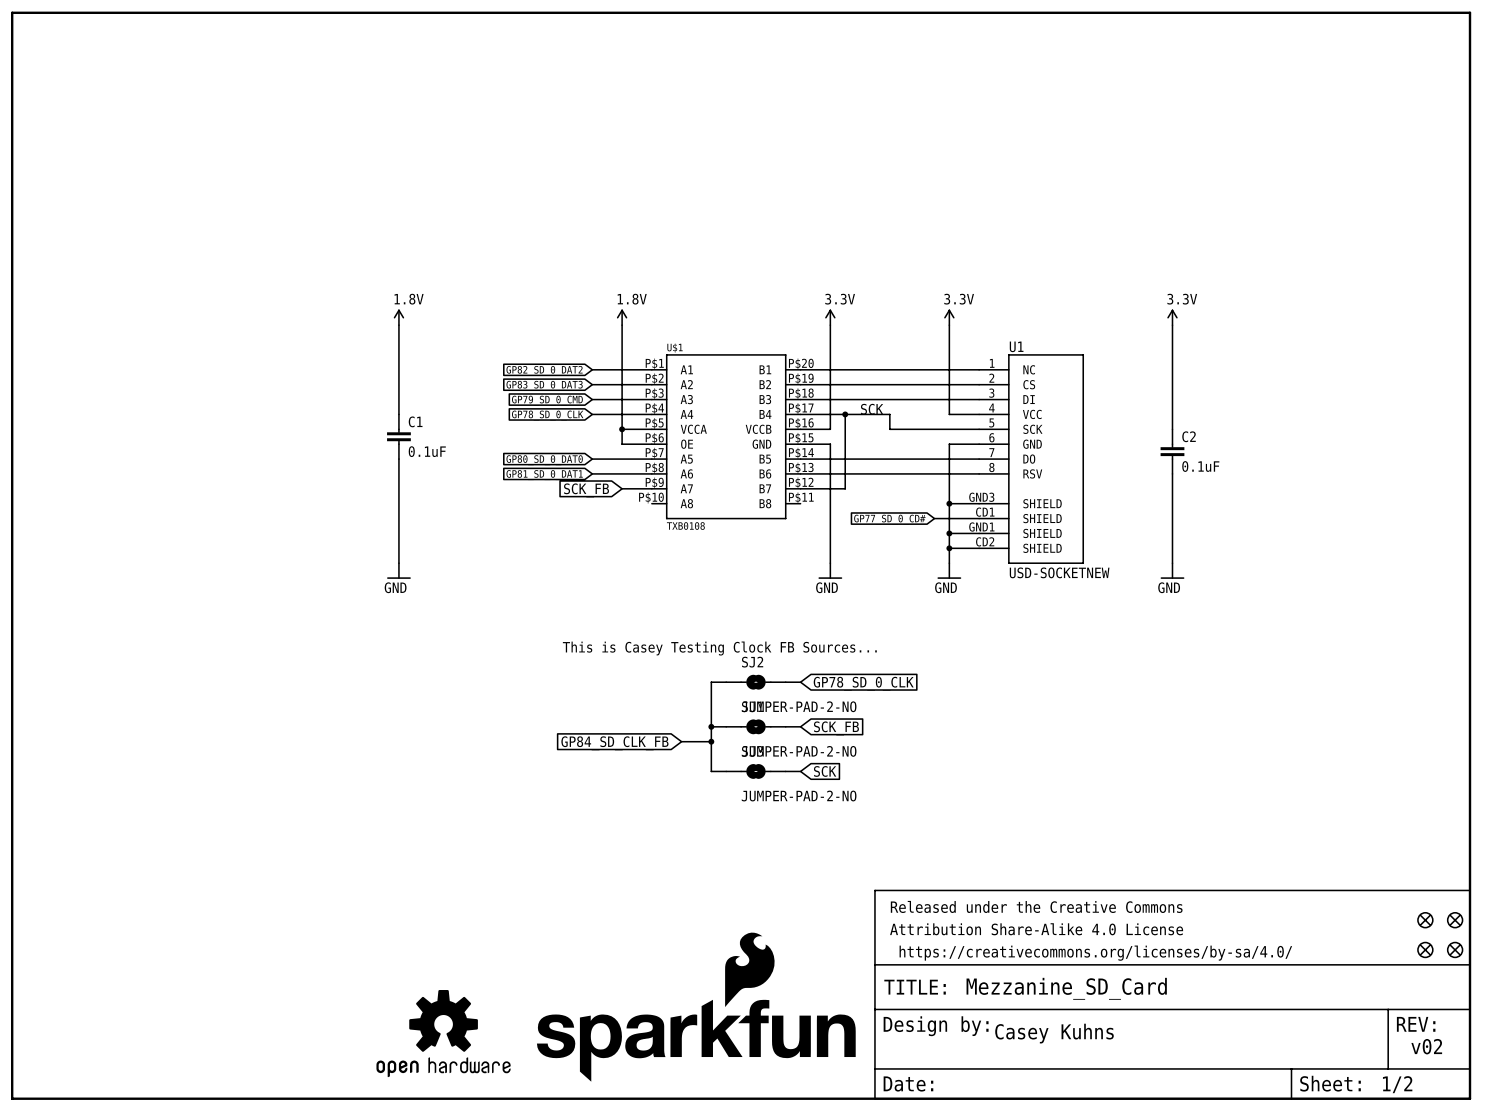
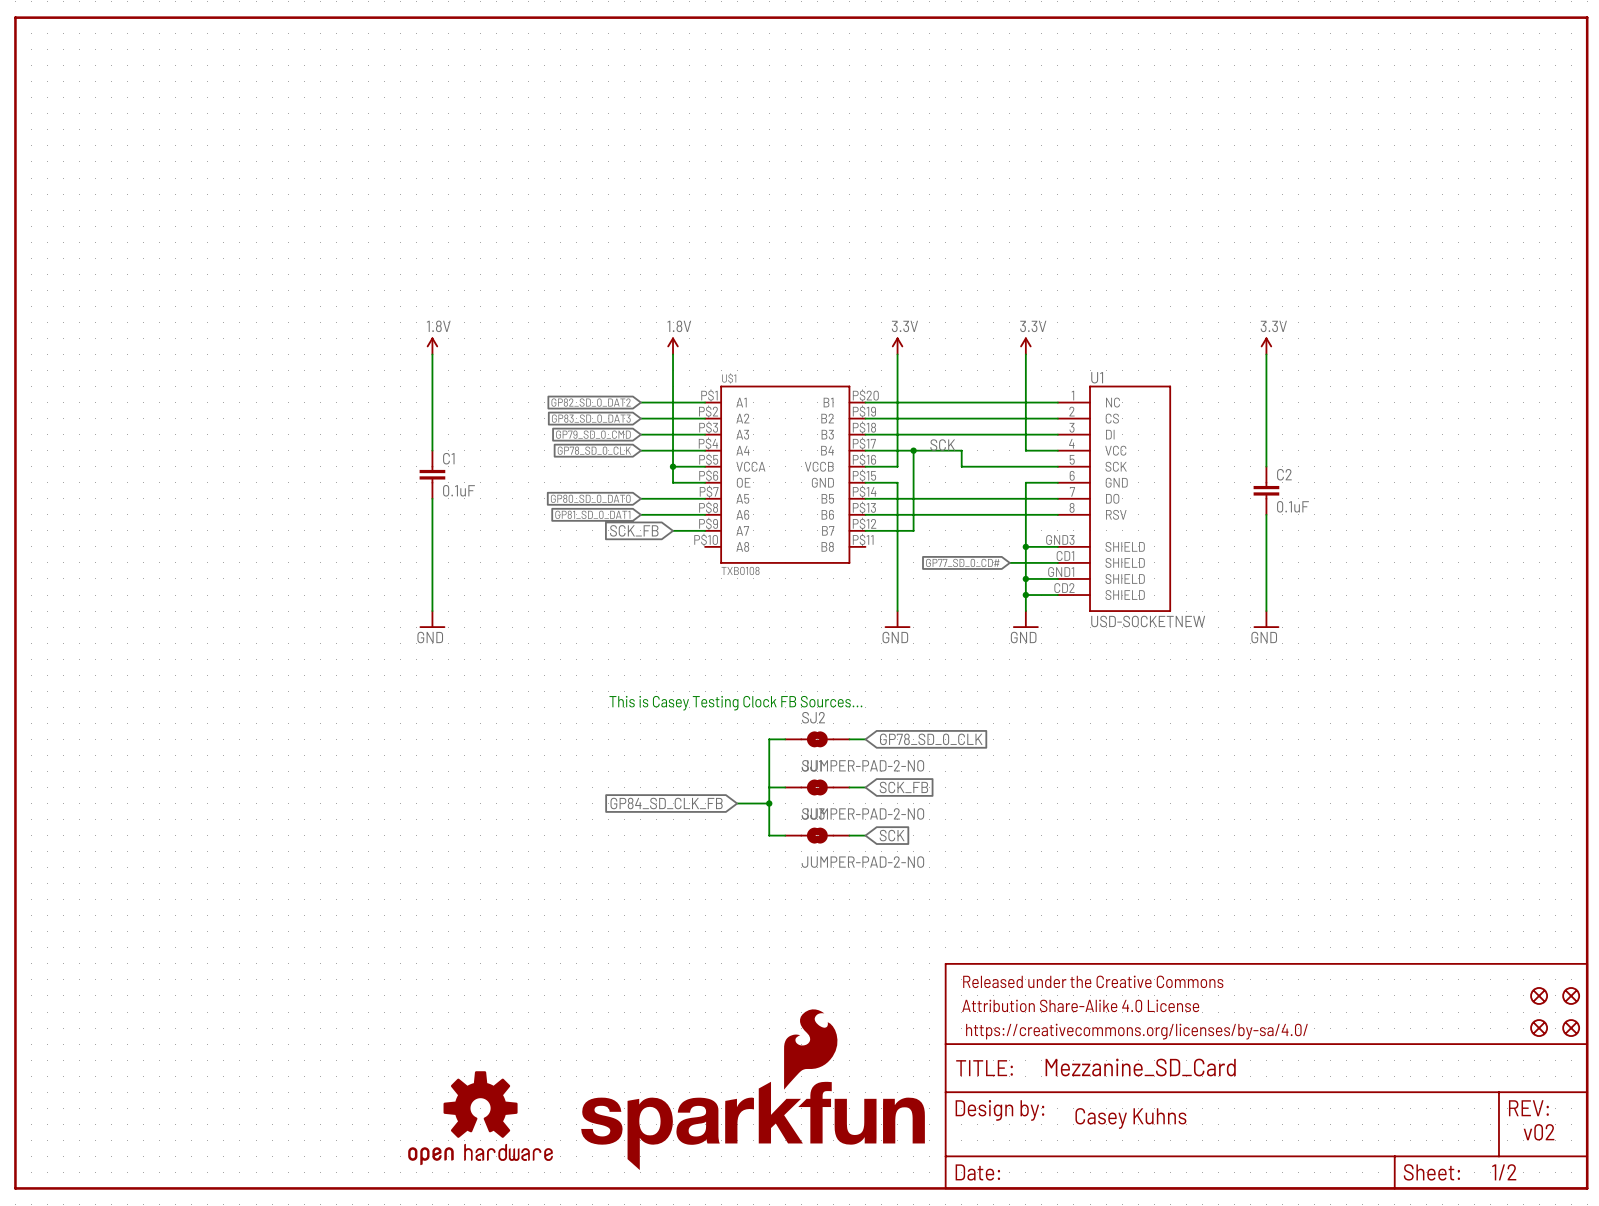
junction: (711, 726) -> none

